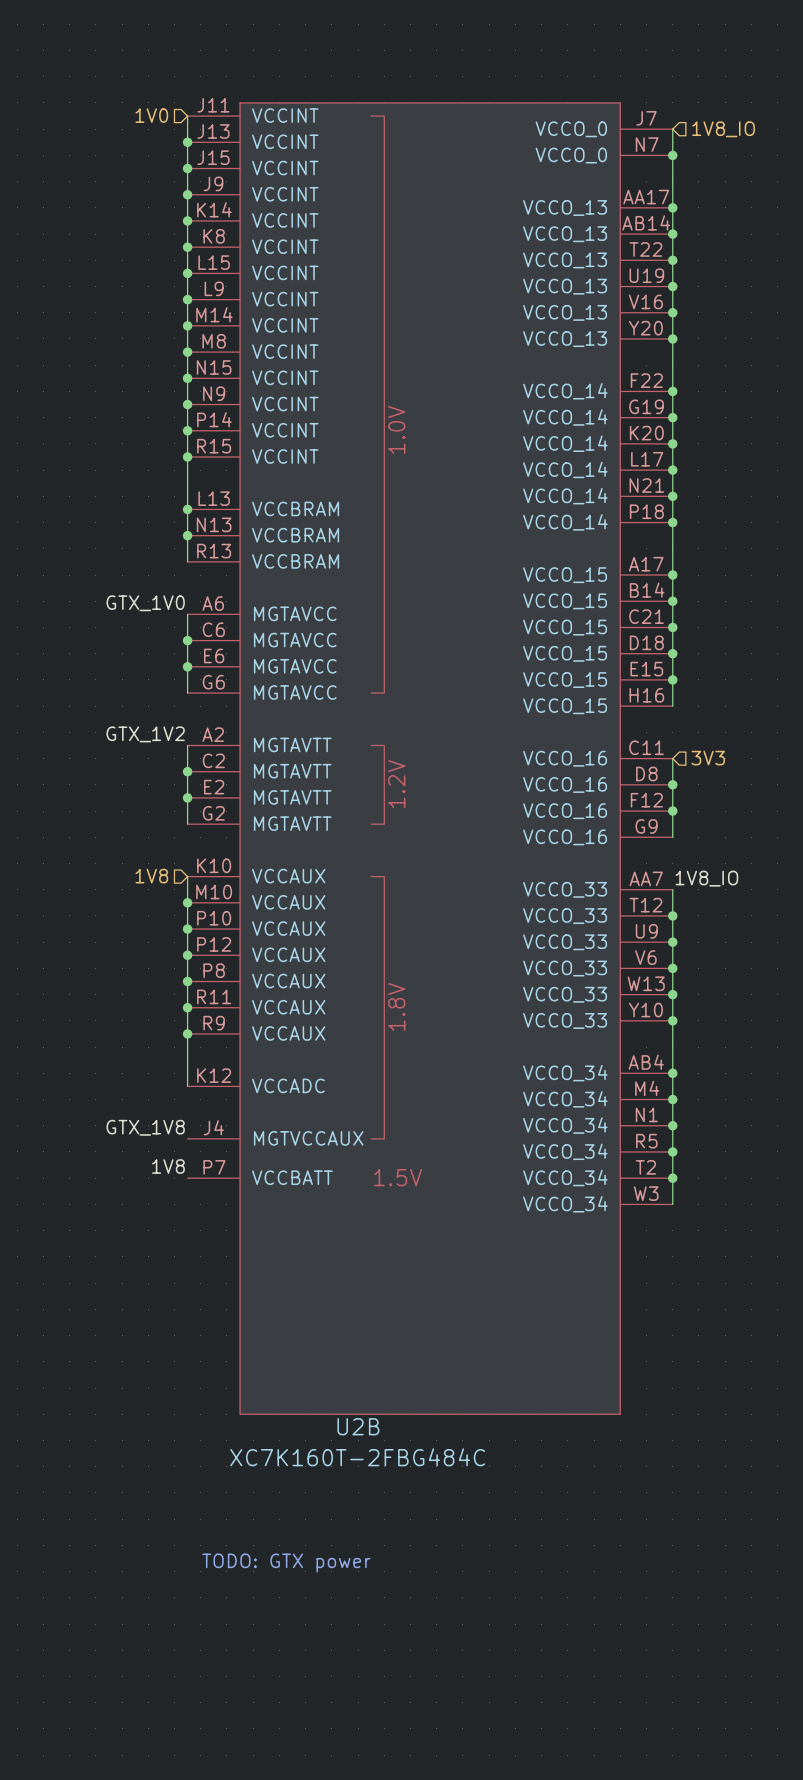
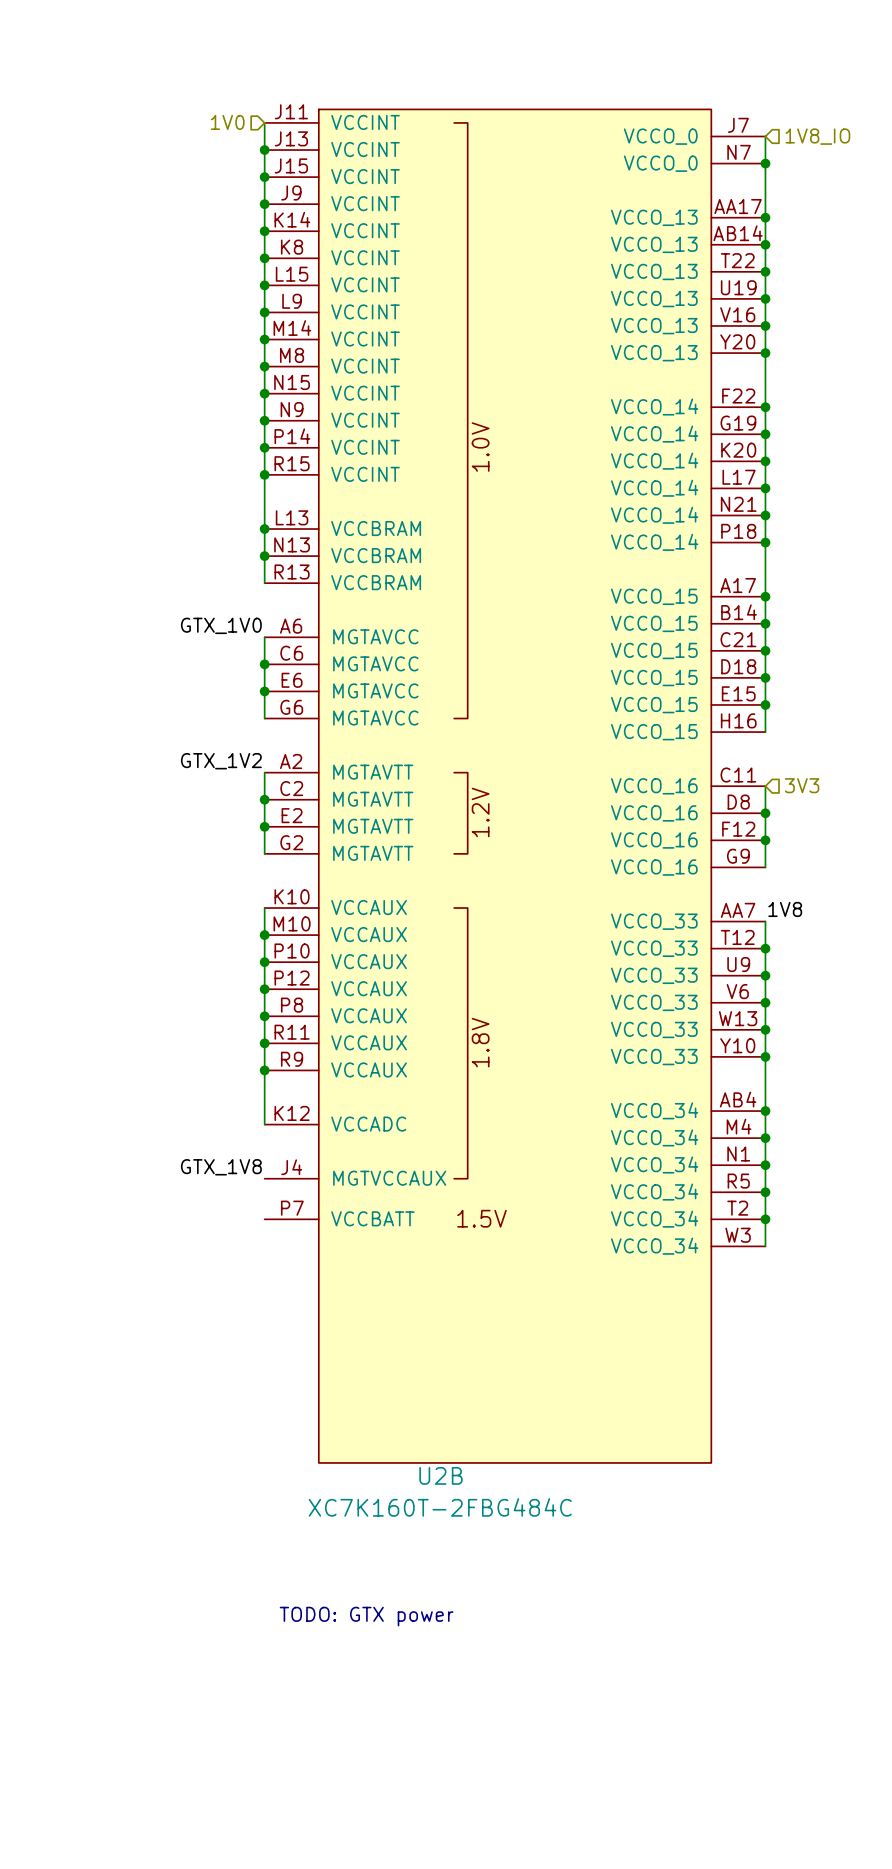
hierarchical label: 1V8 (151, 876) -> none
label: 1V8_IO (706, 878) -> 1V8 (785, 909)
label: 1V8 (168, 1166) -> none

